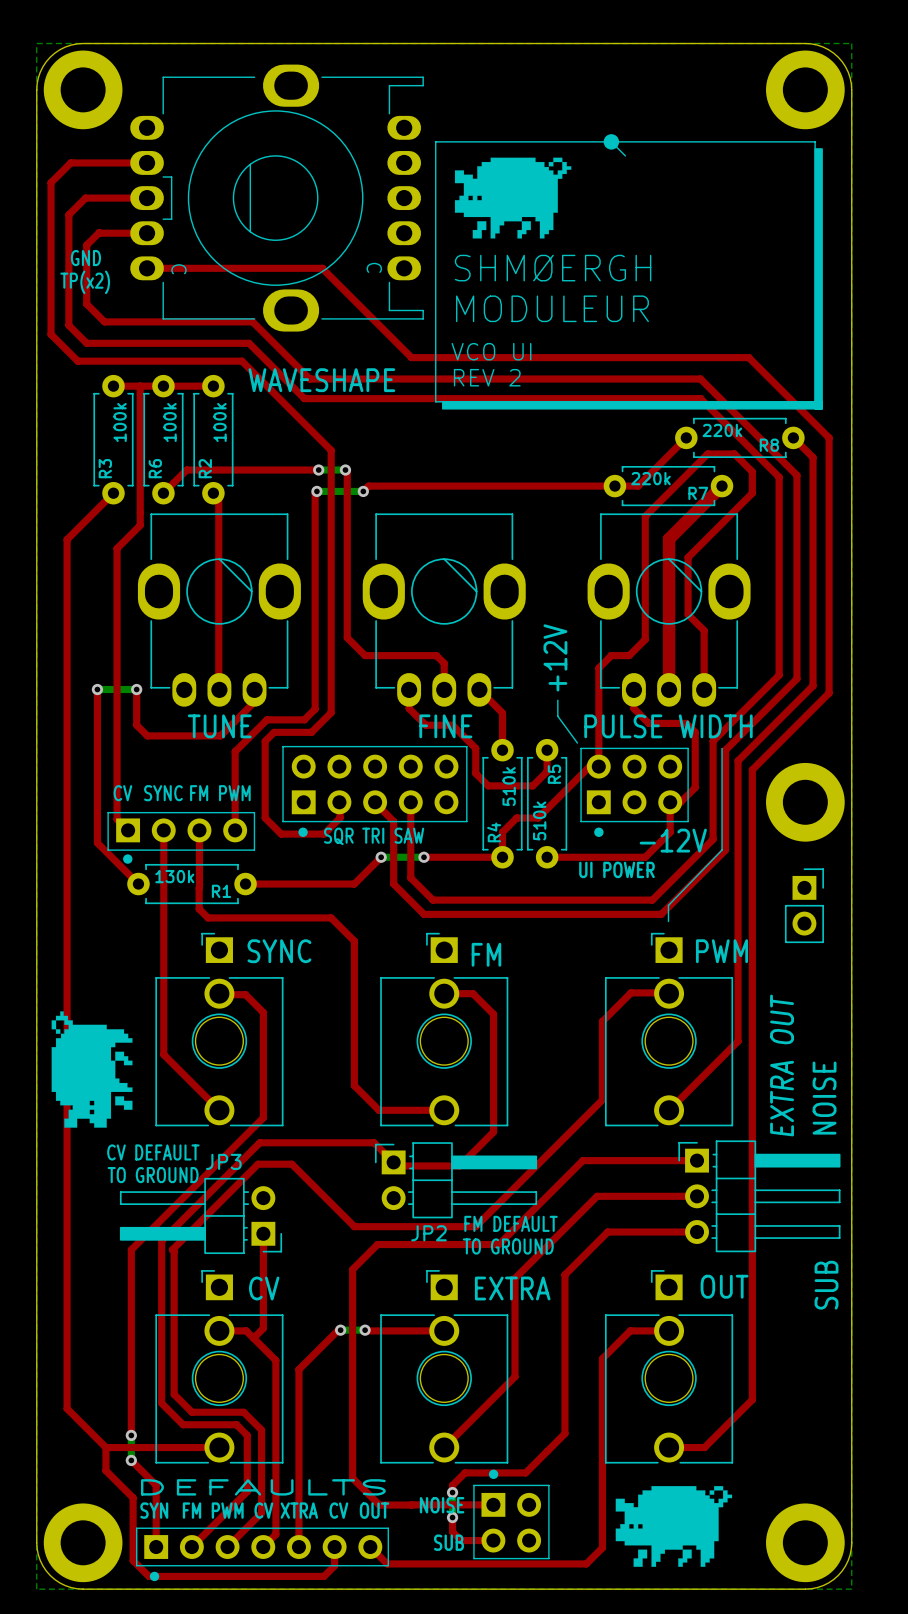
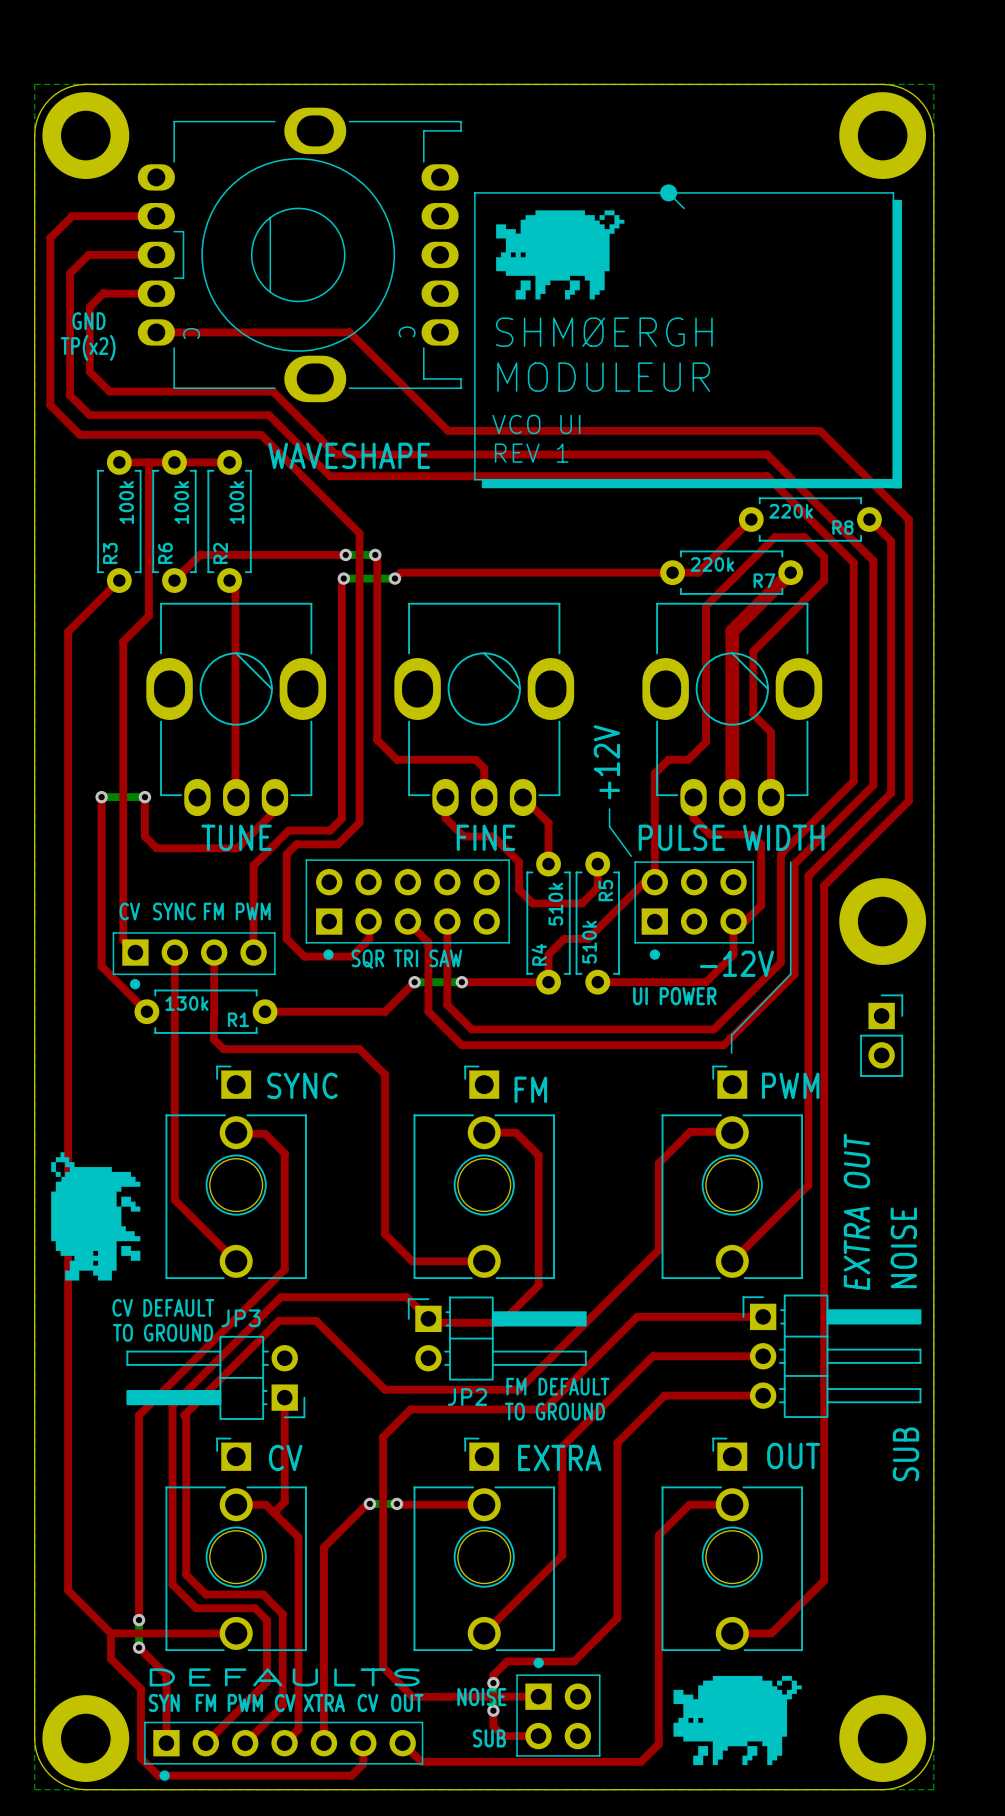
text: REV 2 (487, 377) -> REV 1 (531, 453)

